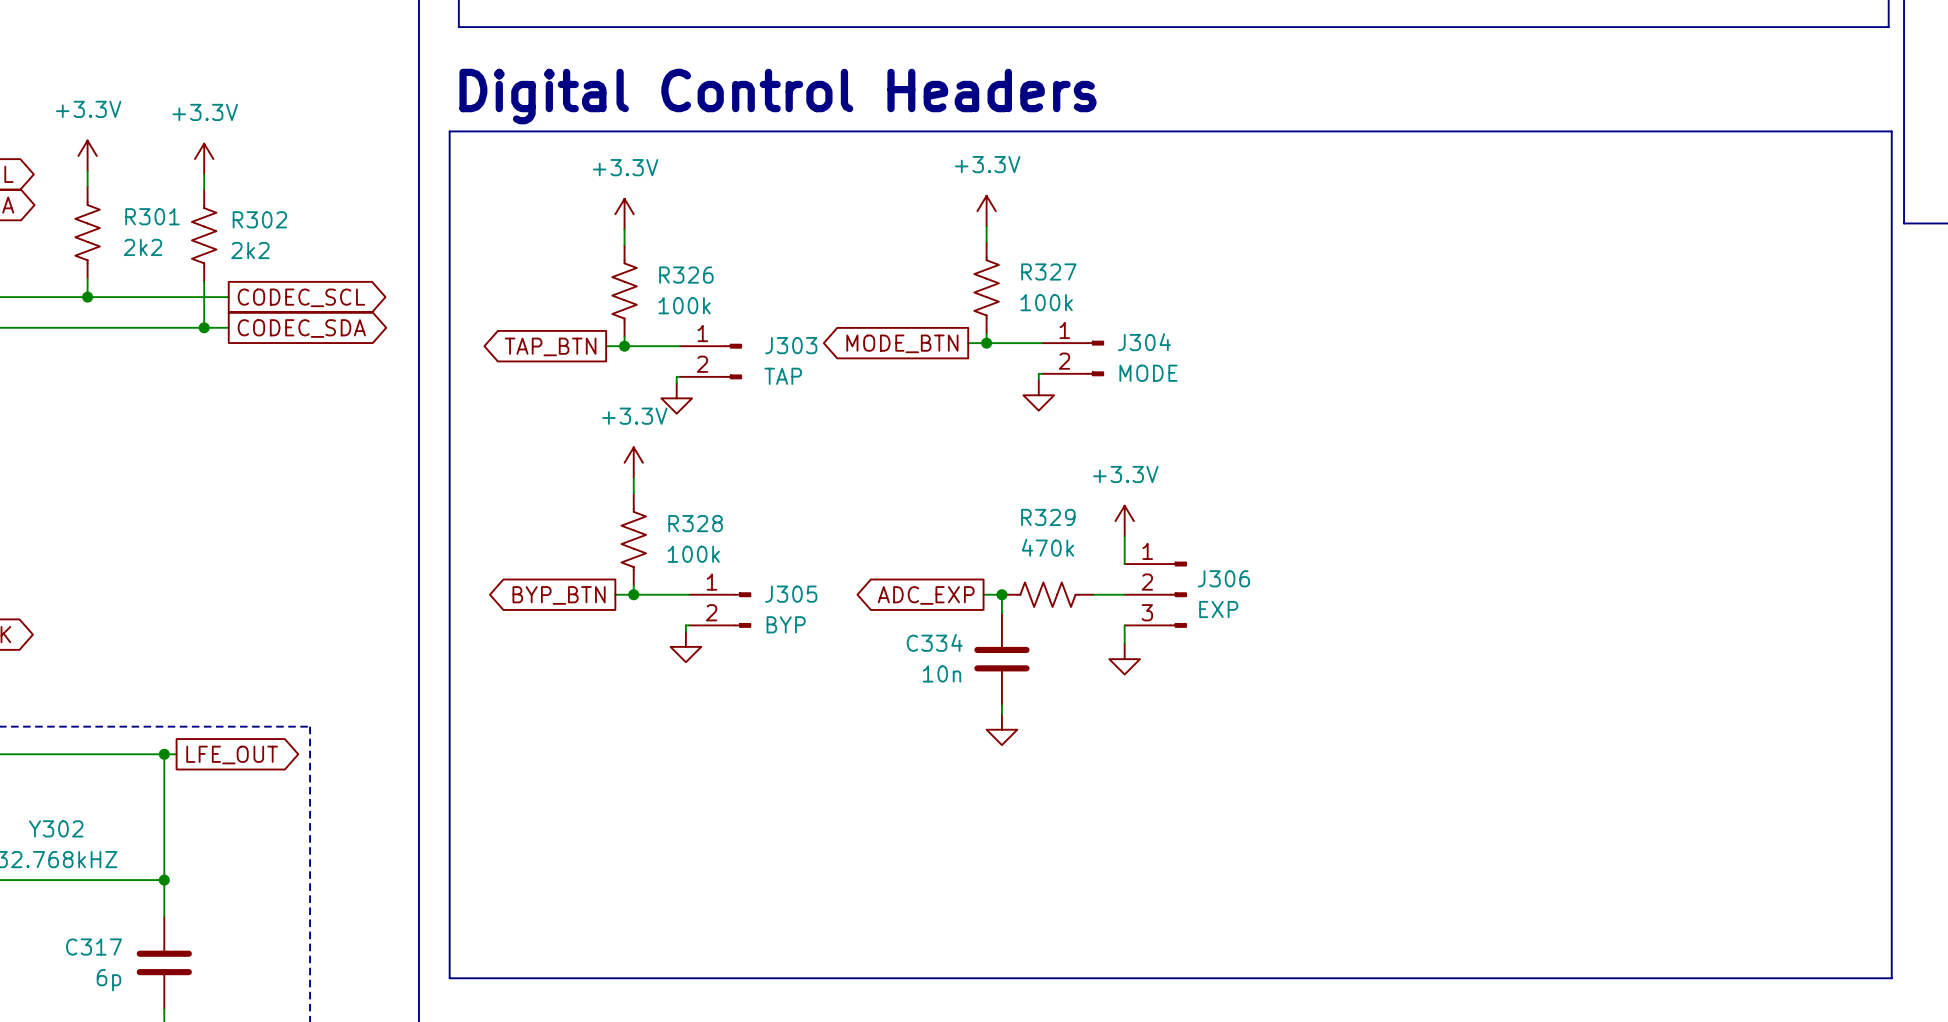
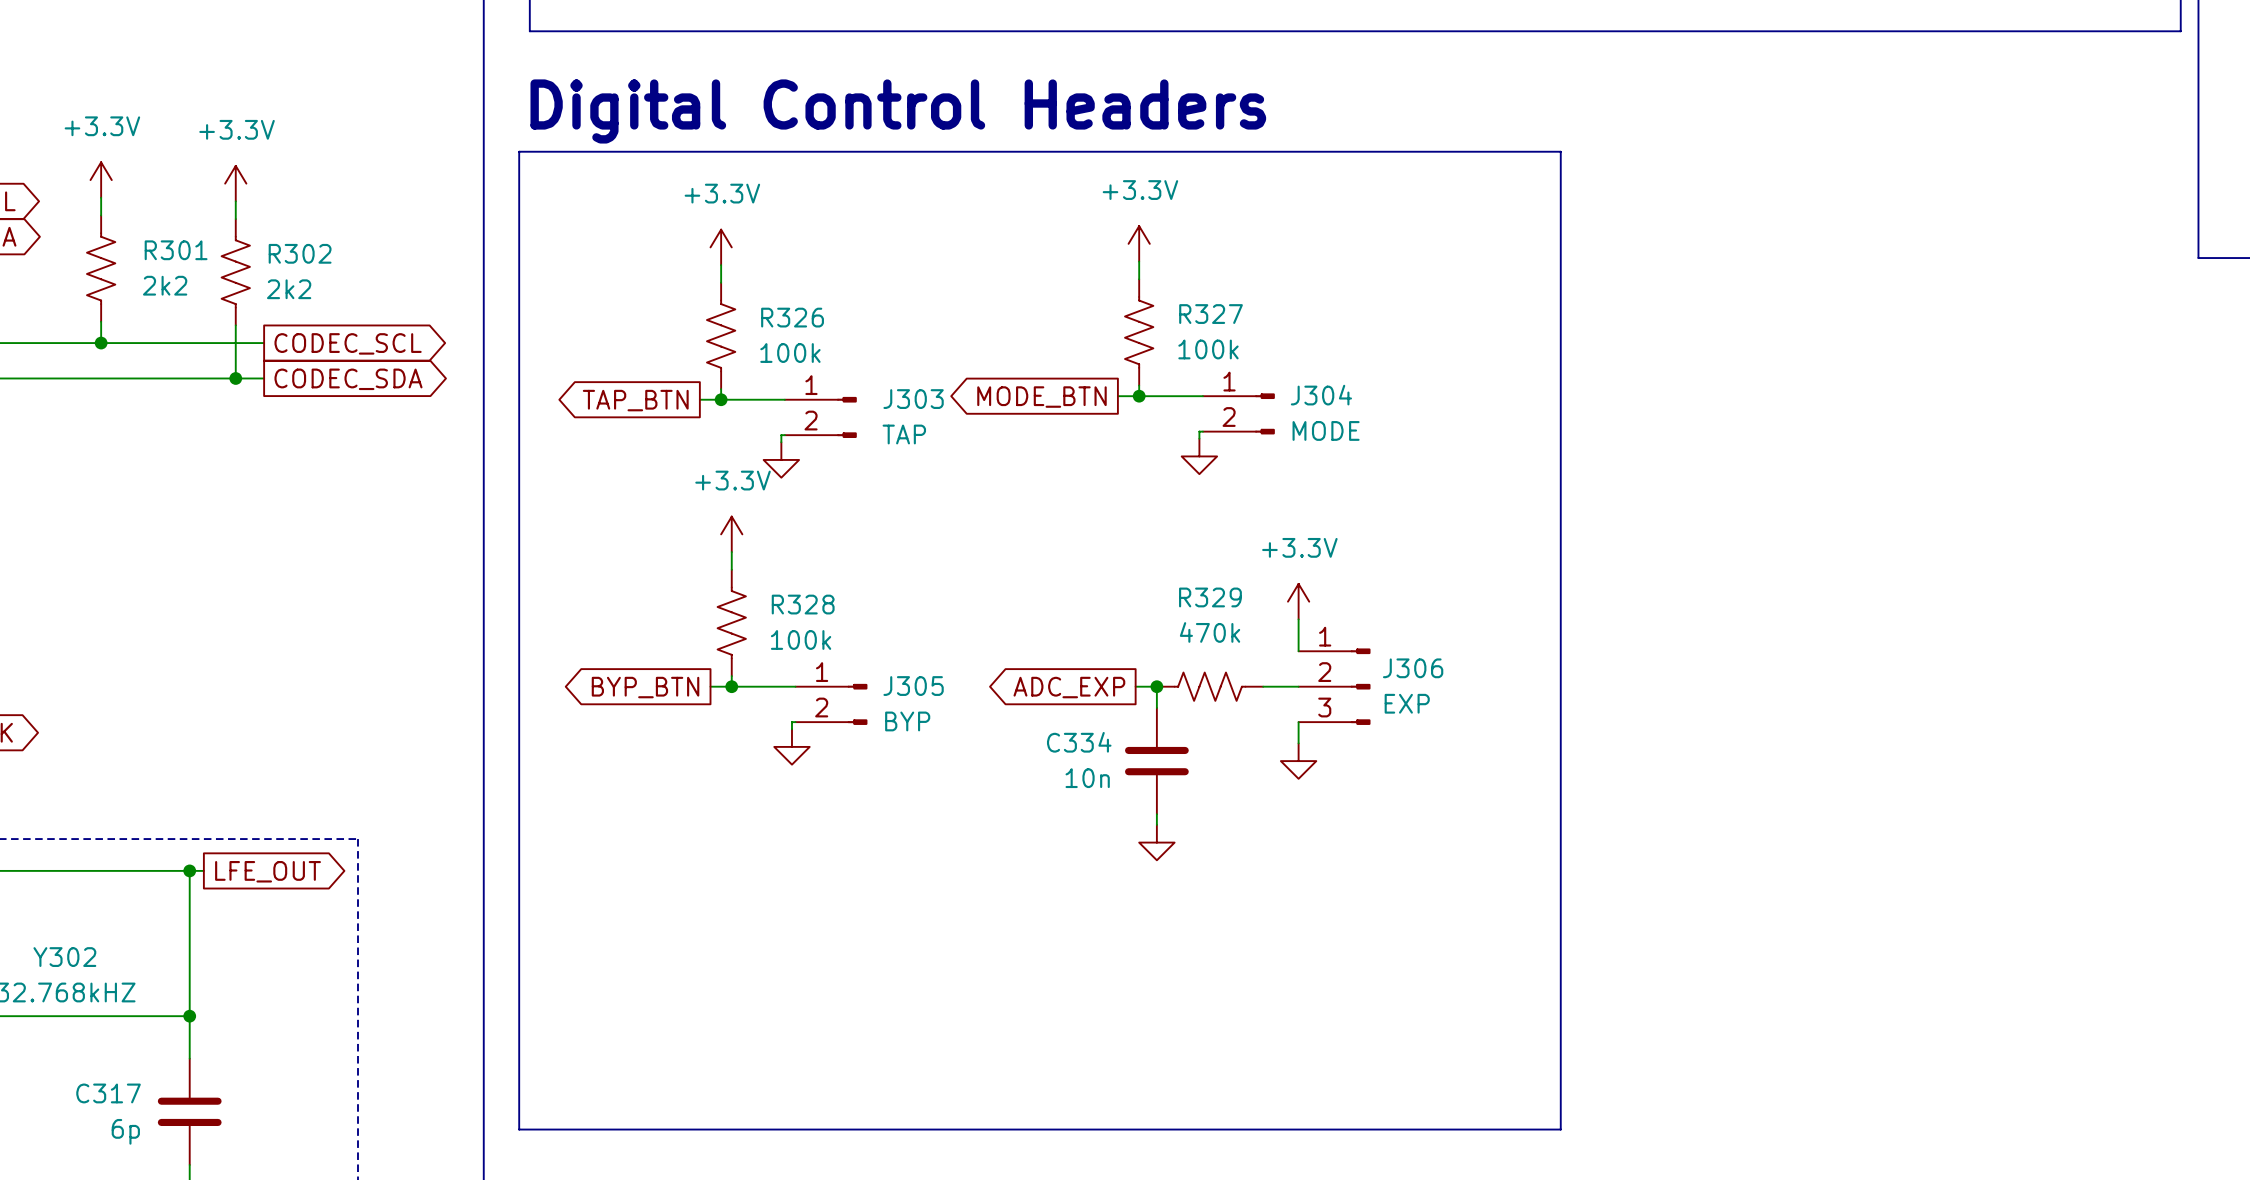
line: (1351, 131) (1891, 131) (1891, 978) (1351, 978) -> (1560, 151) (1560, 1129)

